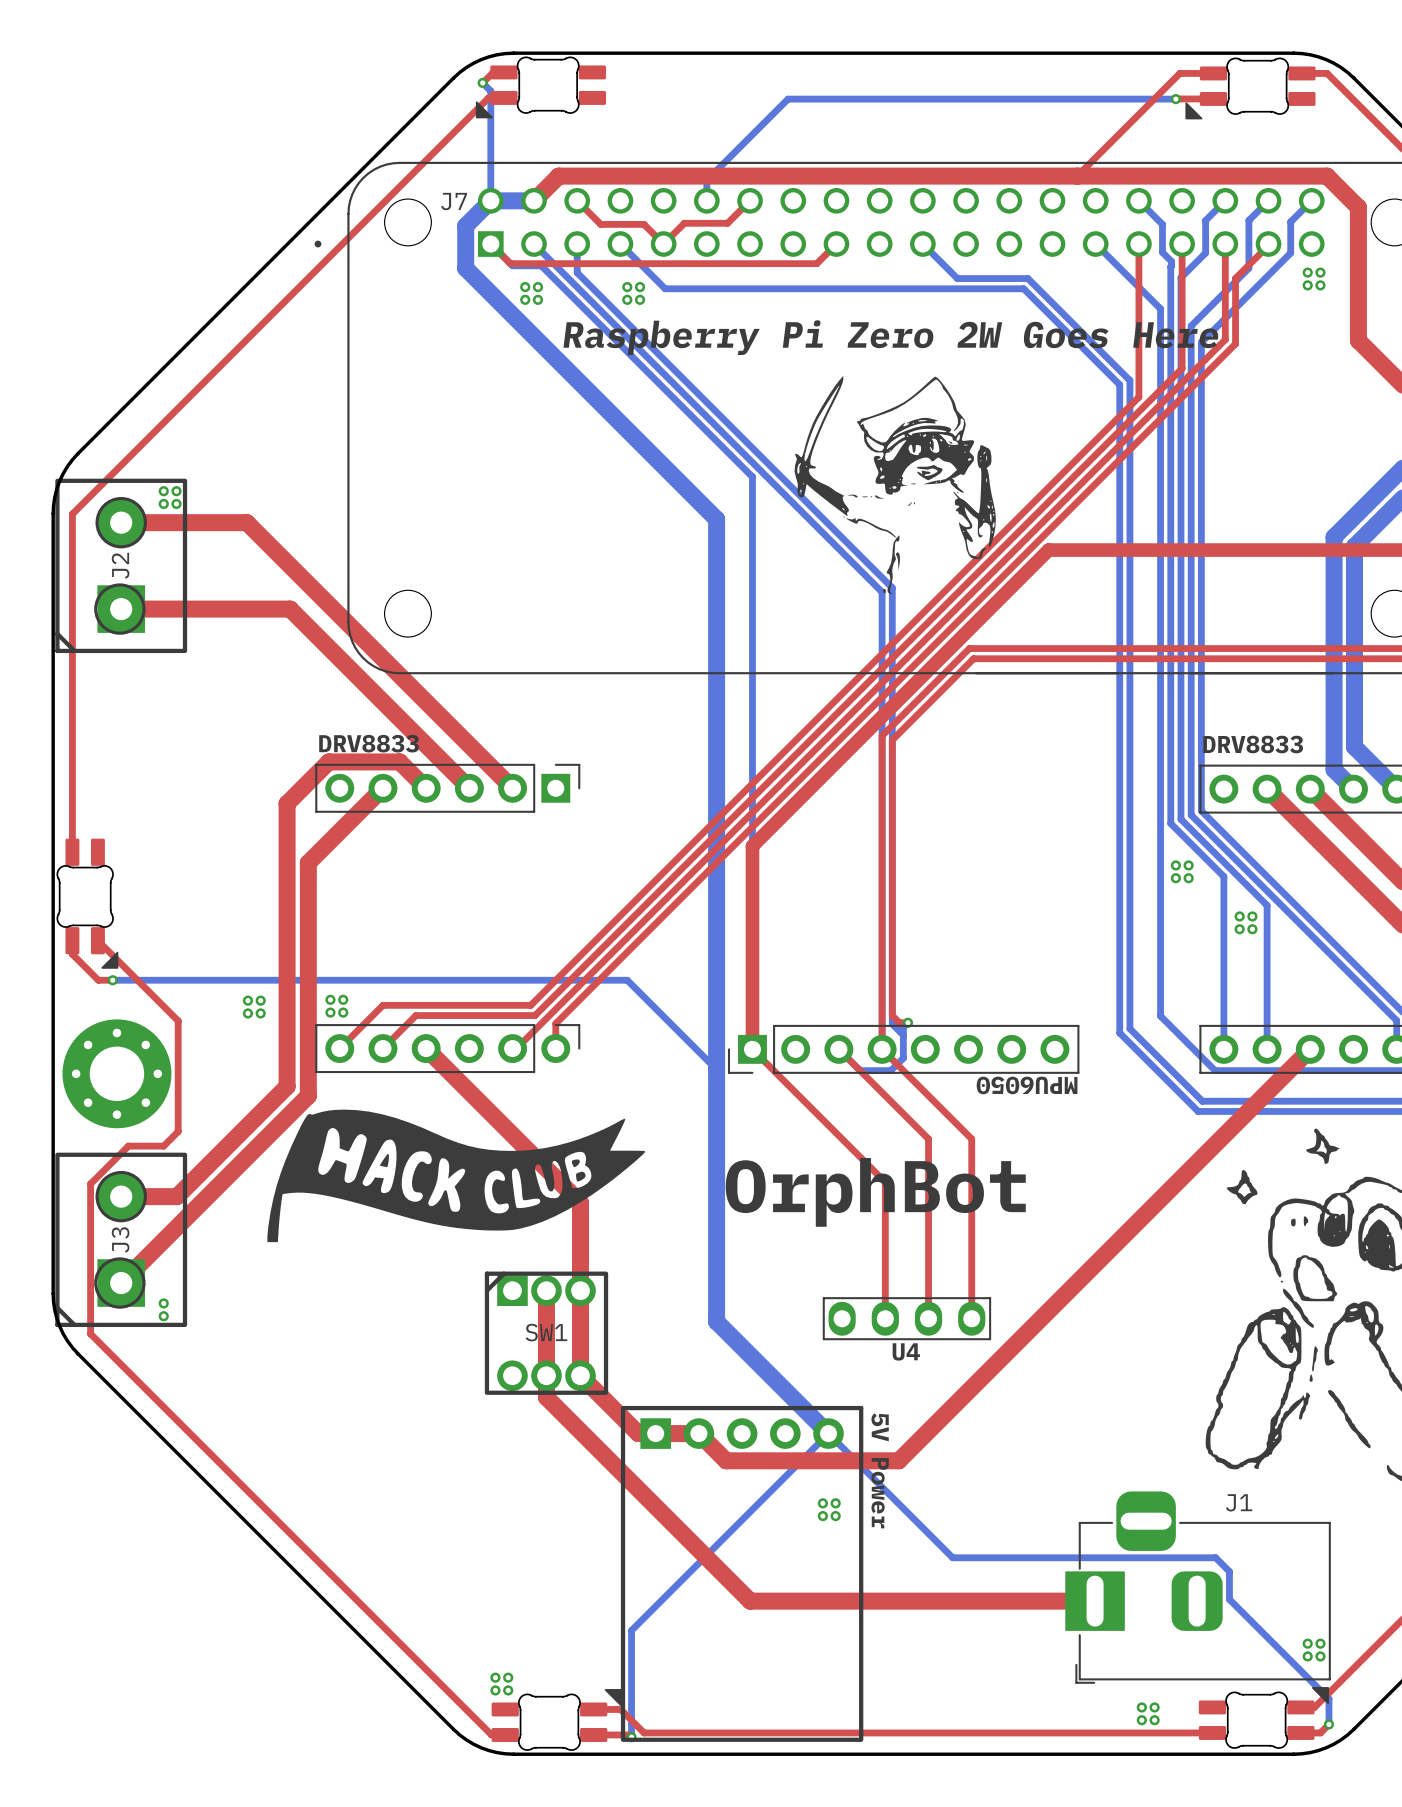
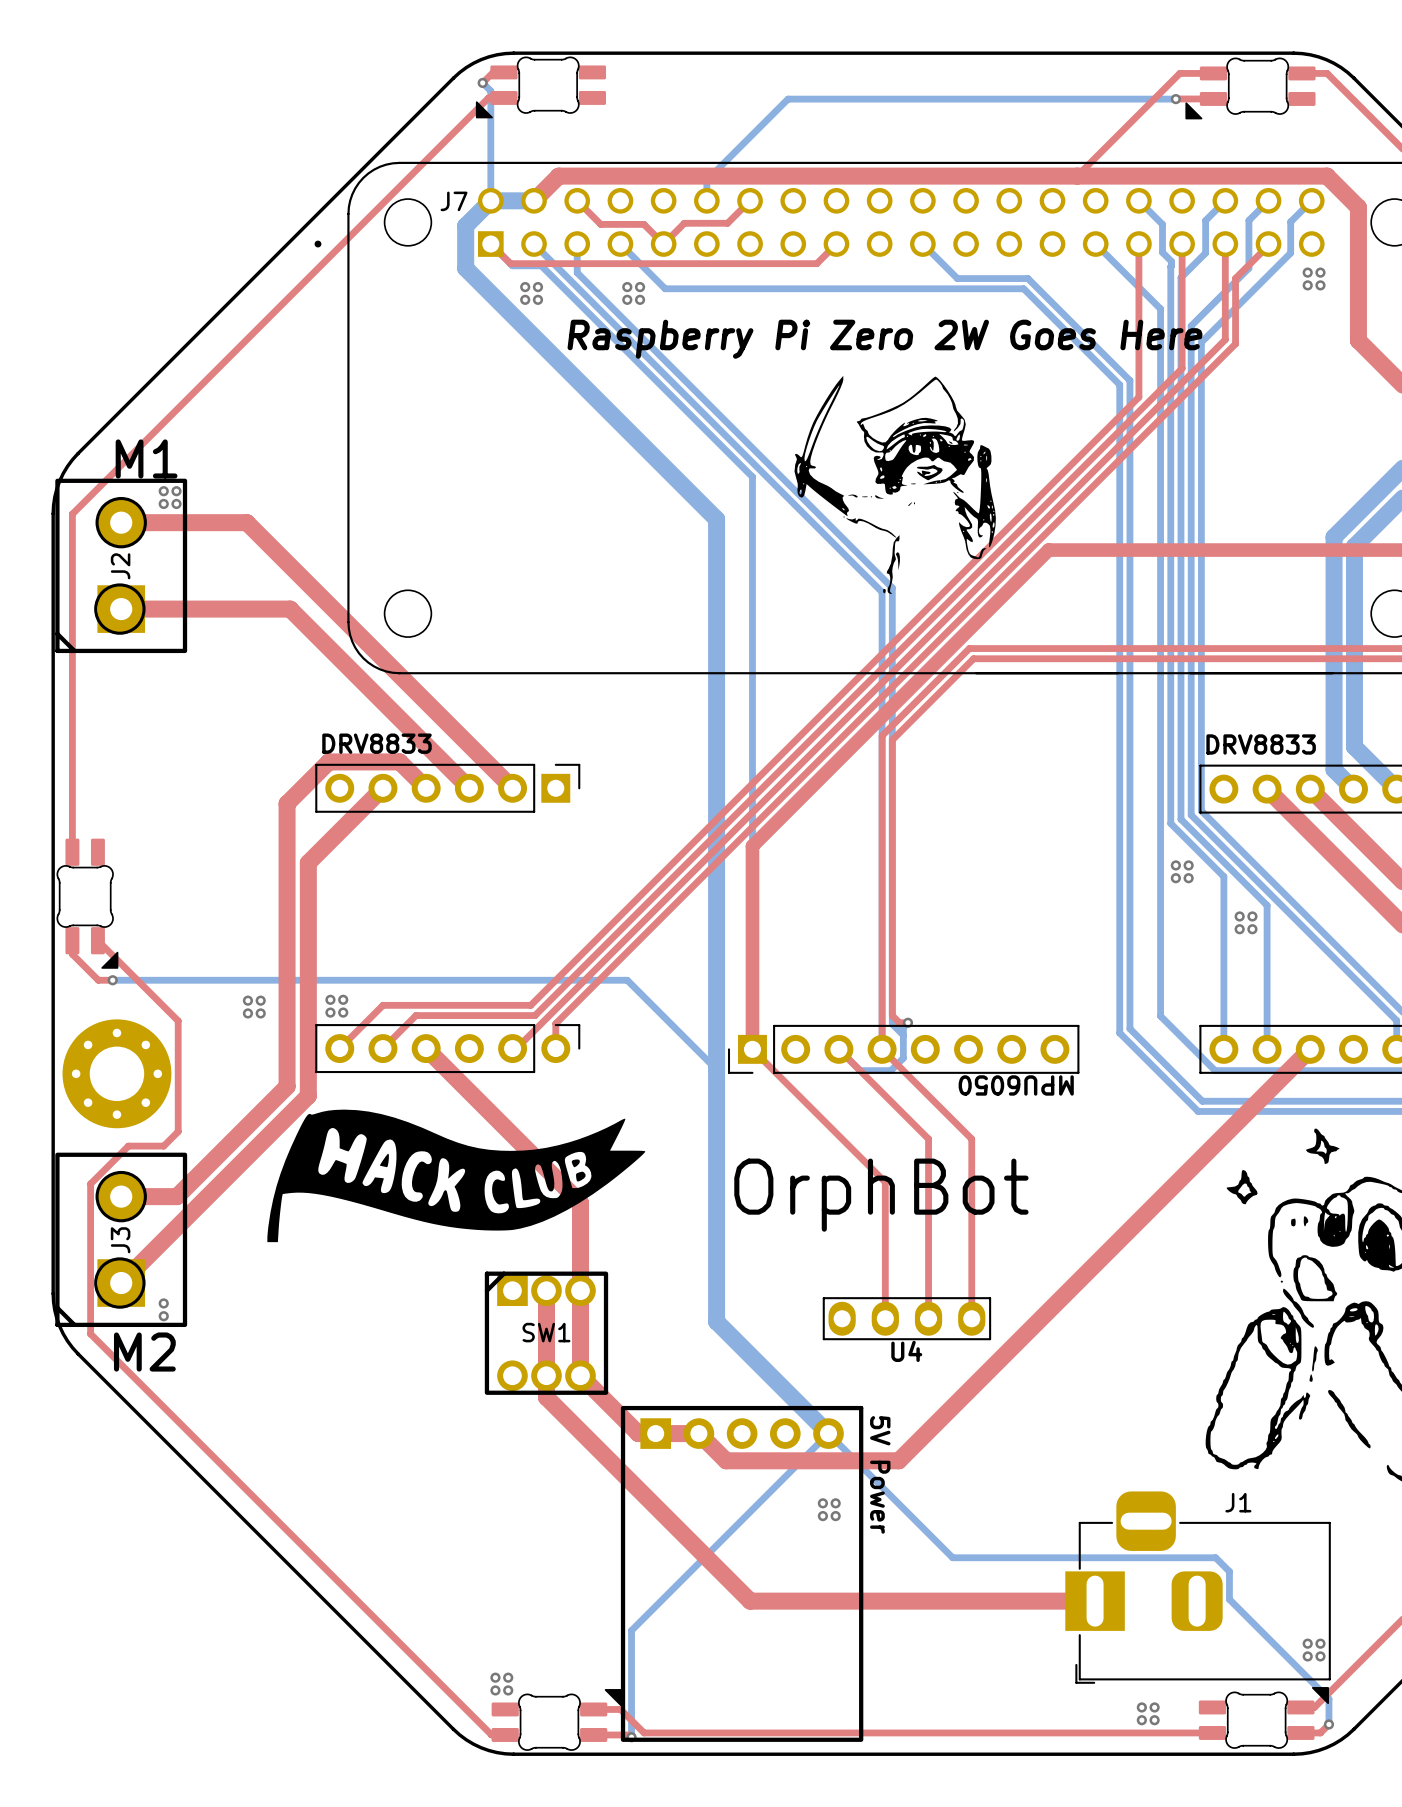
text: none -> M1 (146, 458)
text: none -> M2 (144, 1352)

